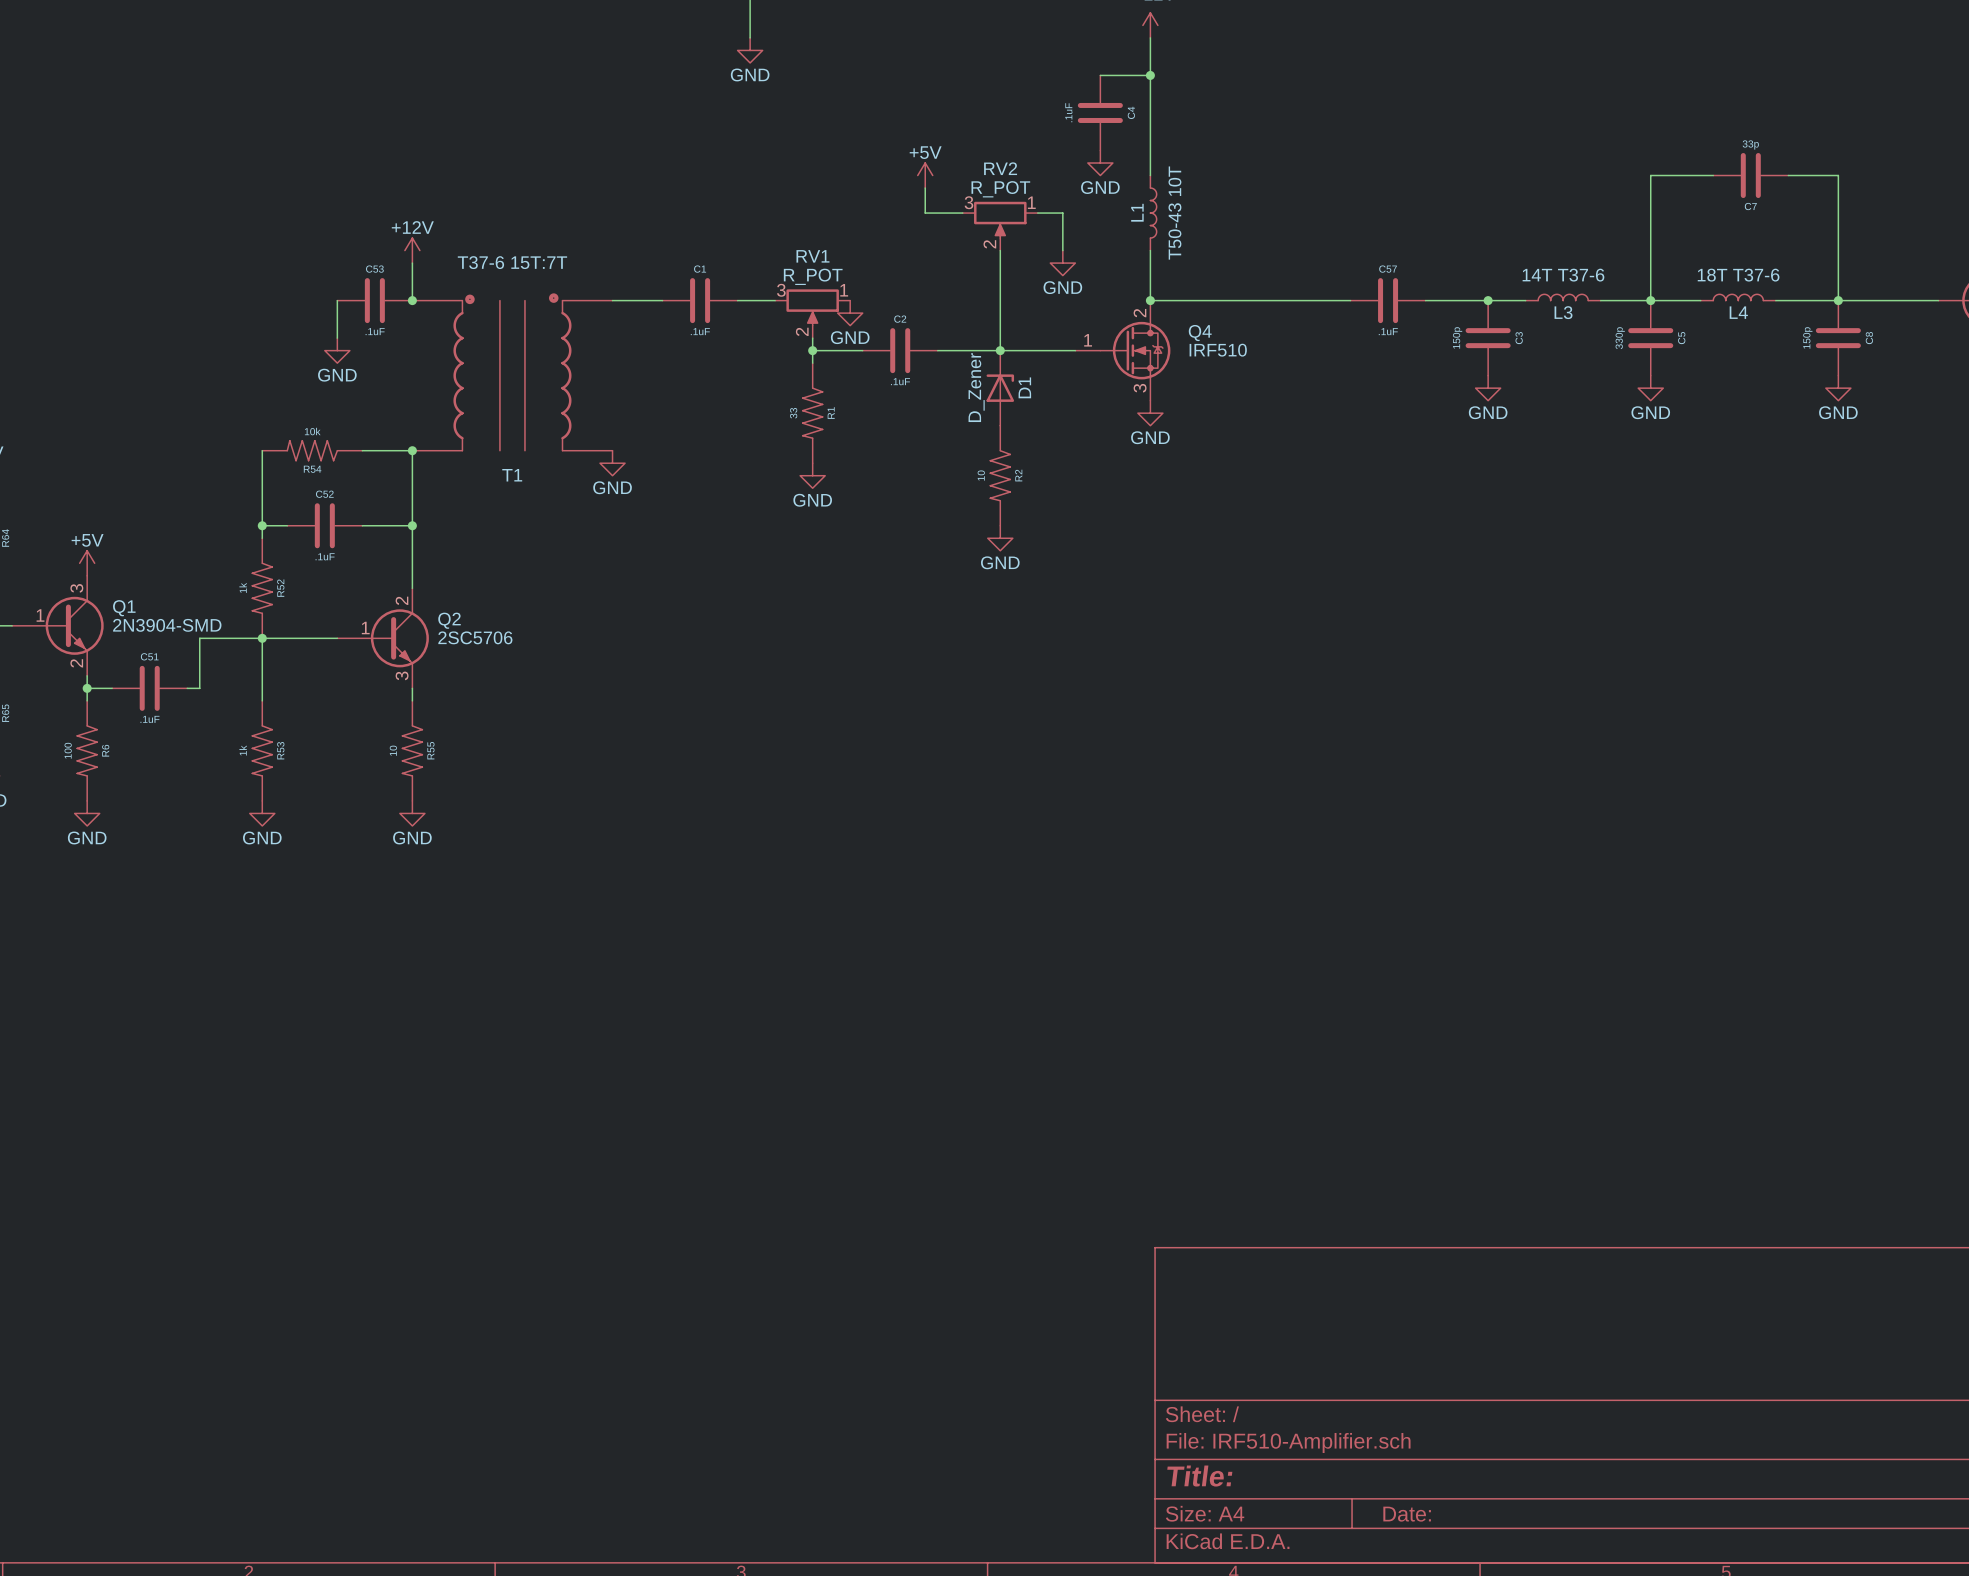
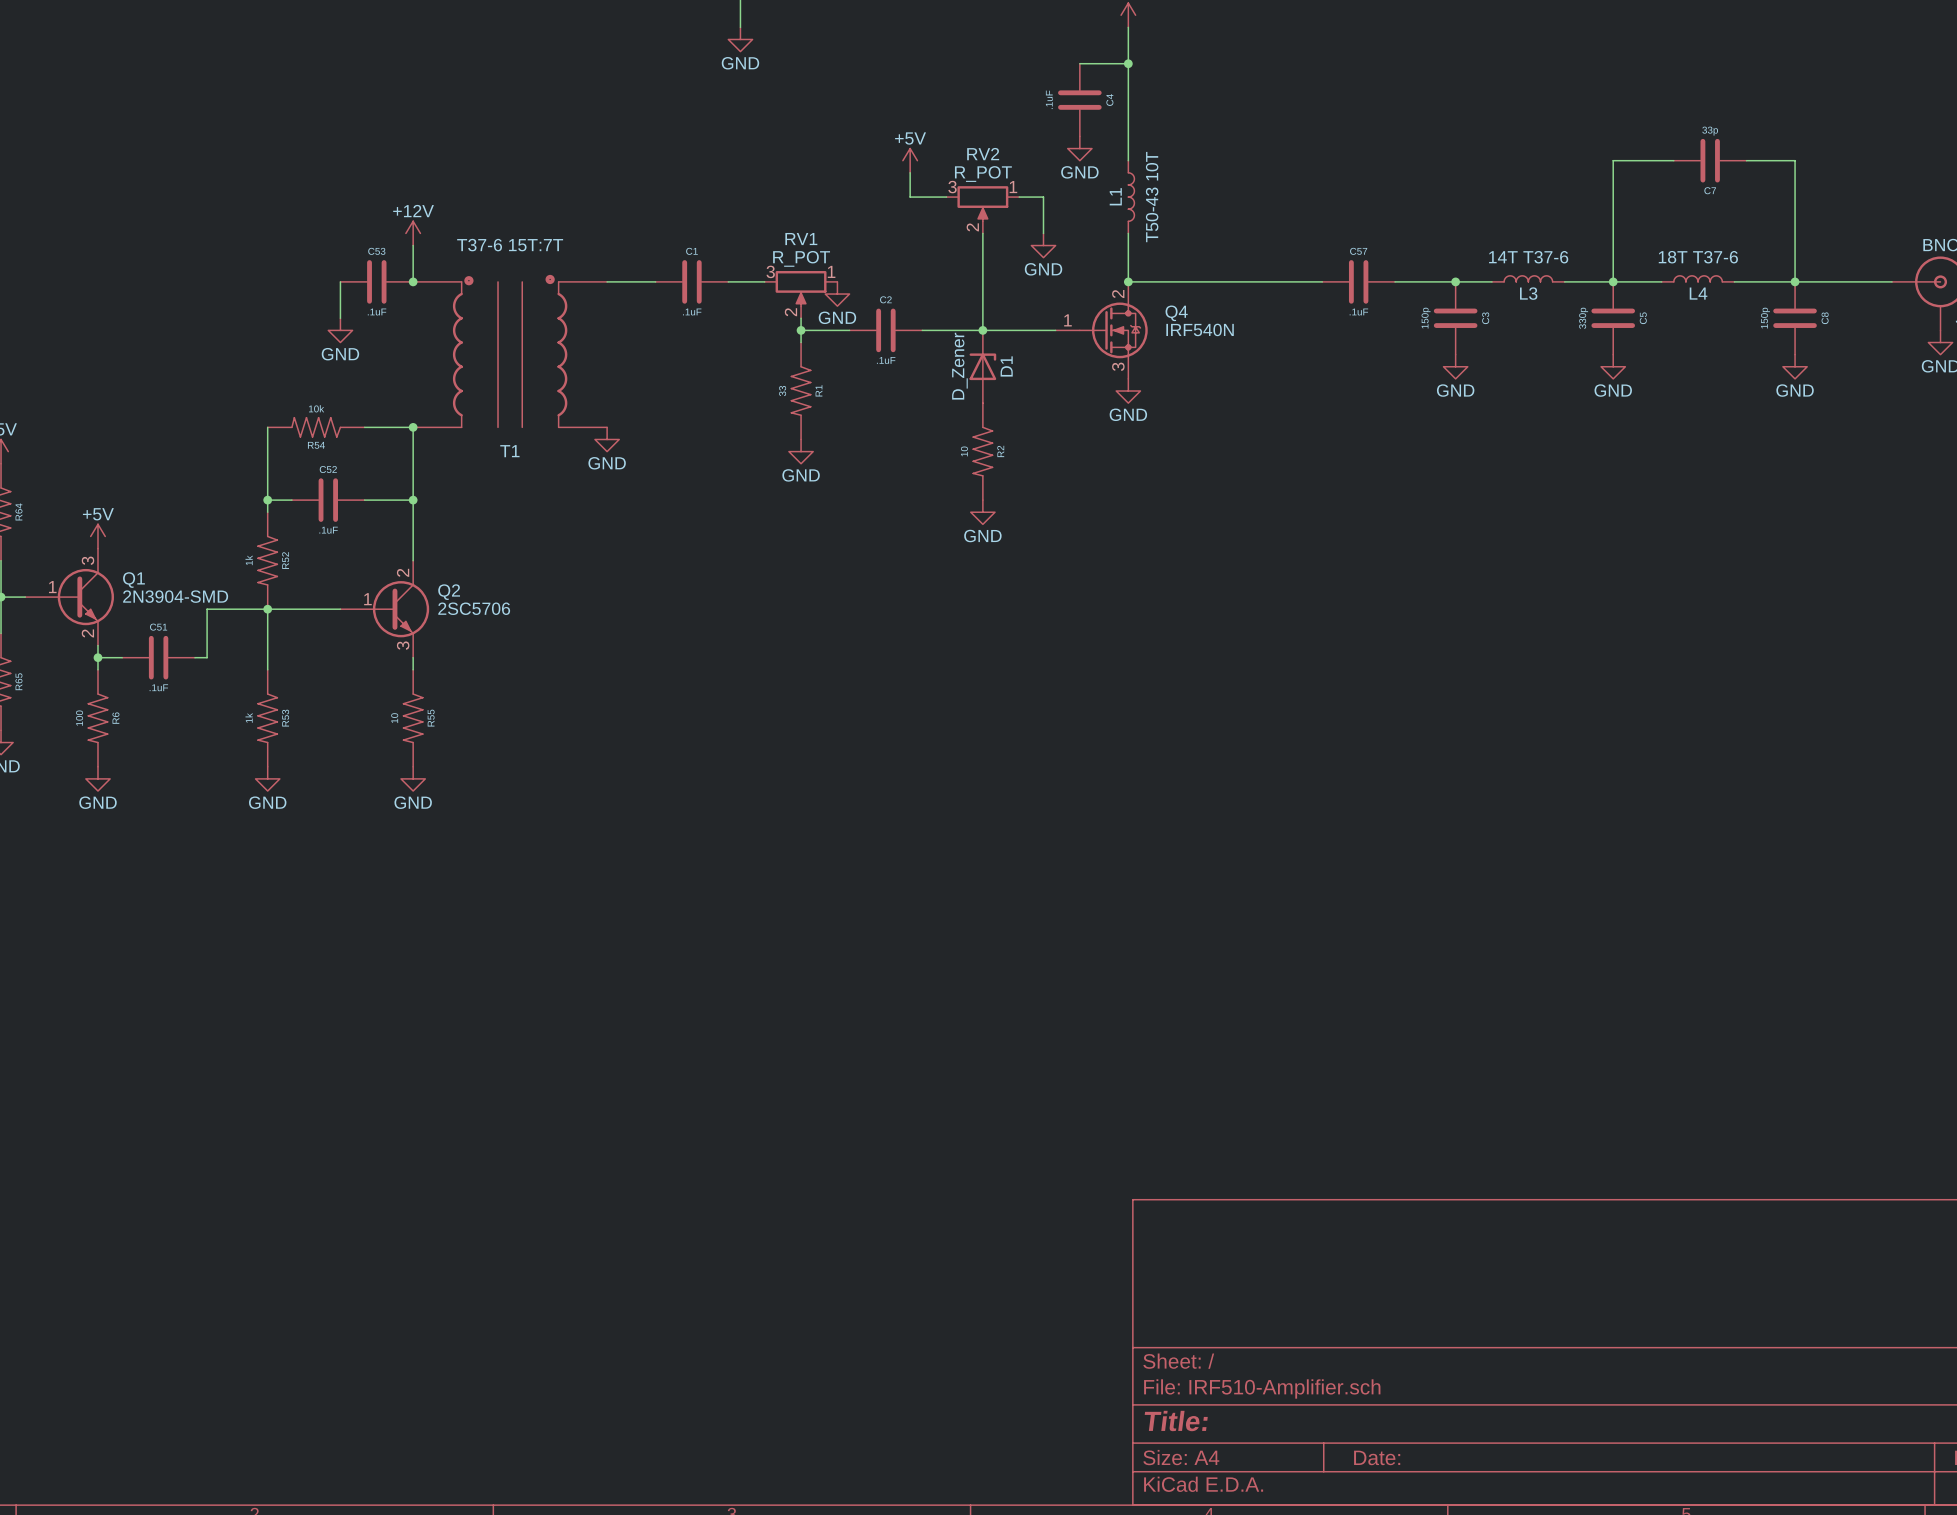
Q4 value: IRF510 (1218, 350) -> IRF540N (1200, 329)

